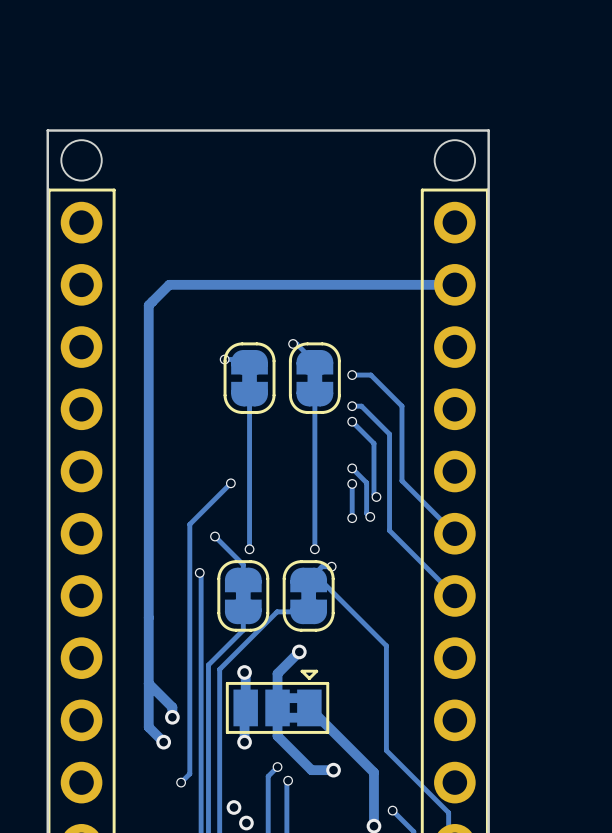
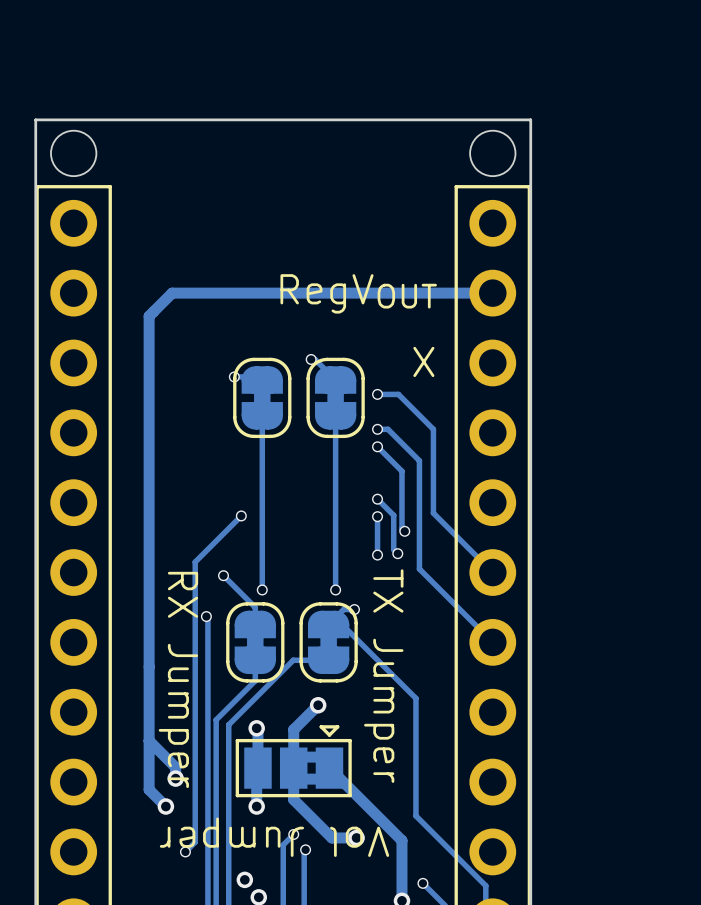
text: none -> RegVOUT (358, 293)
text: none -> X (423, 361)
text: none -> TX Jumper (383, 676)
text: none -> RX Jumper (178, 679)
text: none -> Vol Jumper (274, 837)

